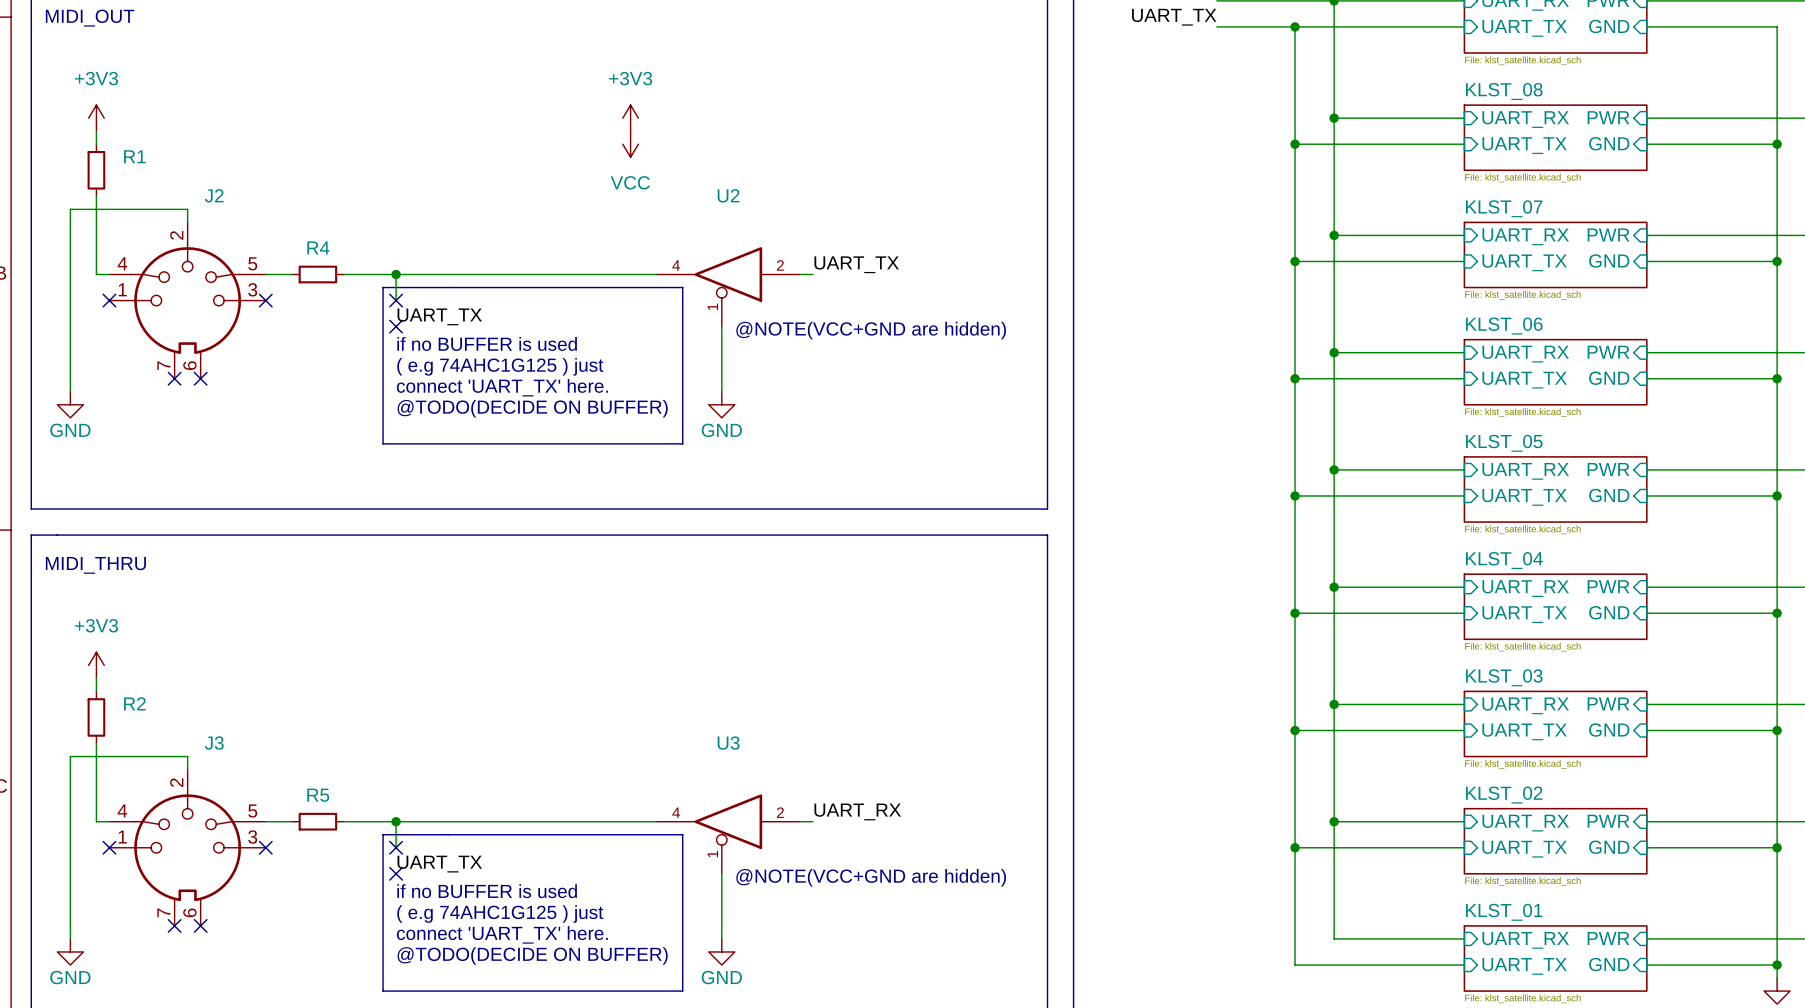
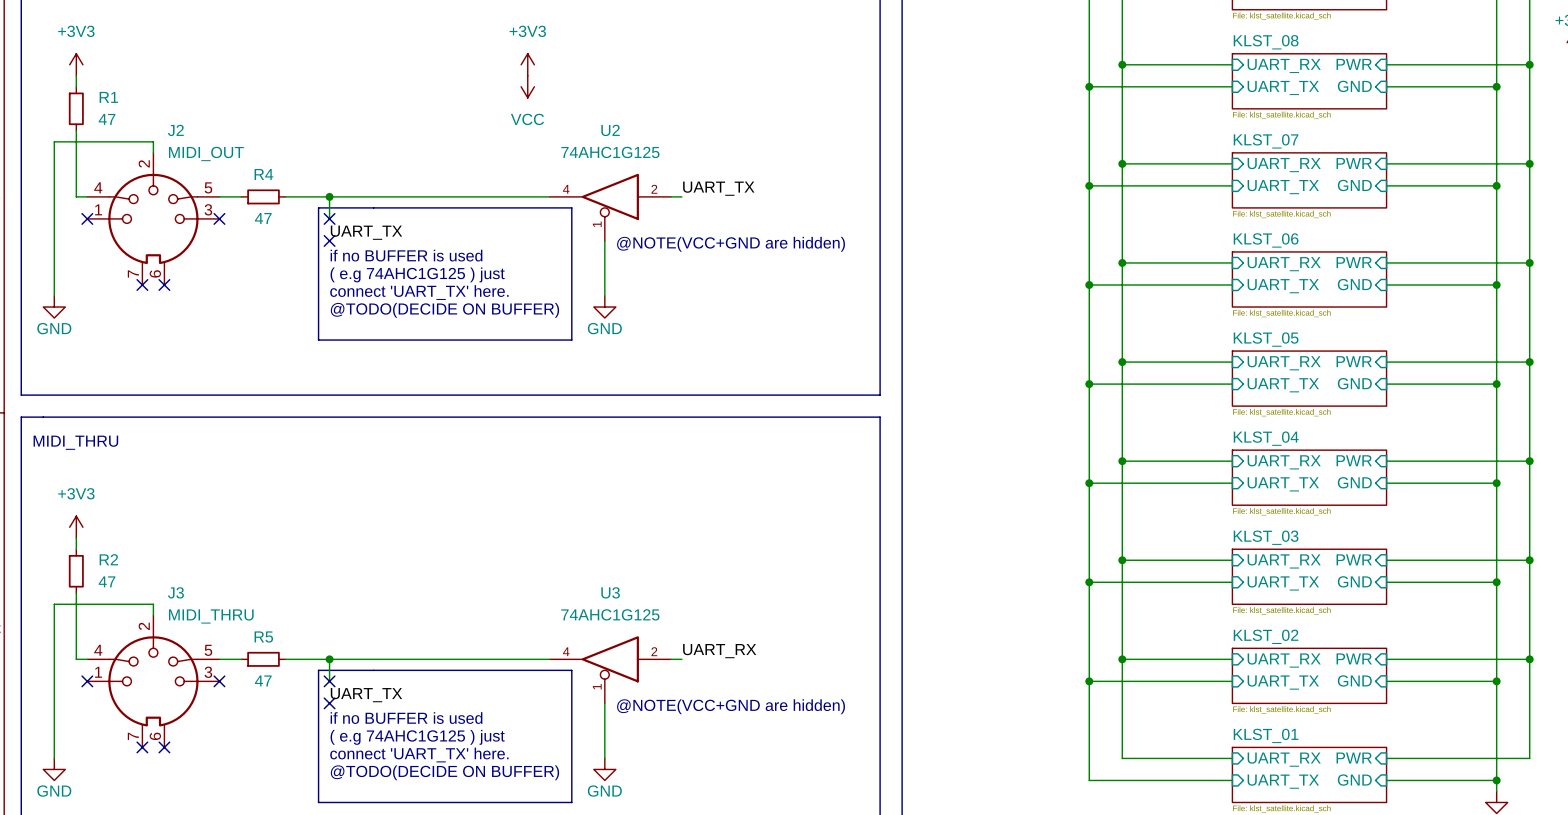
R1 value: none -> 47 (107, 119)
U2 value: none -> 74AHC1G125 (610, 152)
J2 value: none -> MIDI_OUT (206, 153)
R4 value: none -> 47 (263, 218)
R2 value: none -> 47 (107, 581)
U3 value: none -> 74AHC1G125 (610, 614)
J3 value: none -> MIDI_THRU (211, 616)
R5 value: none -> 47 (263, 680)

